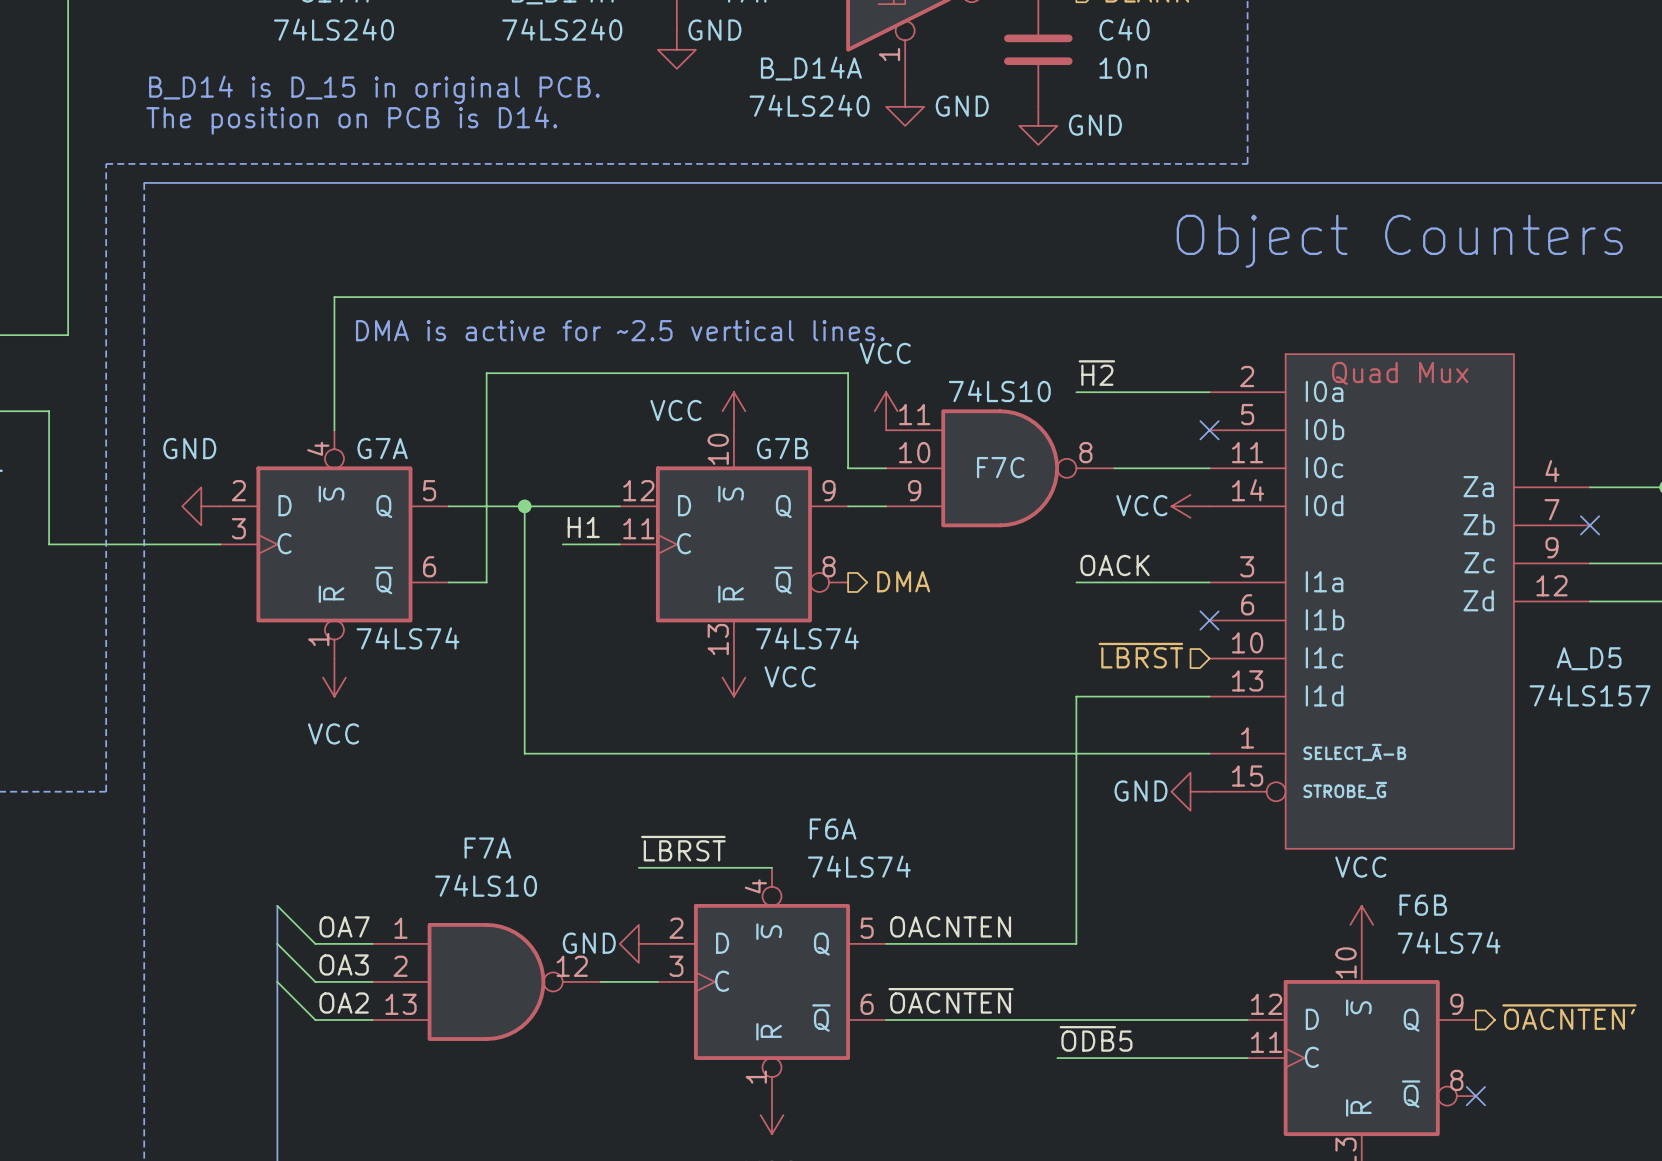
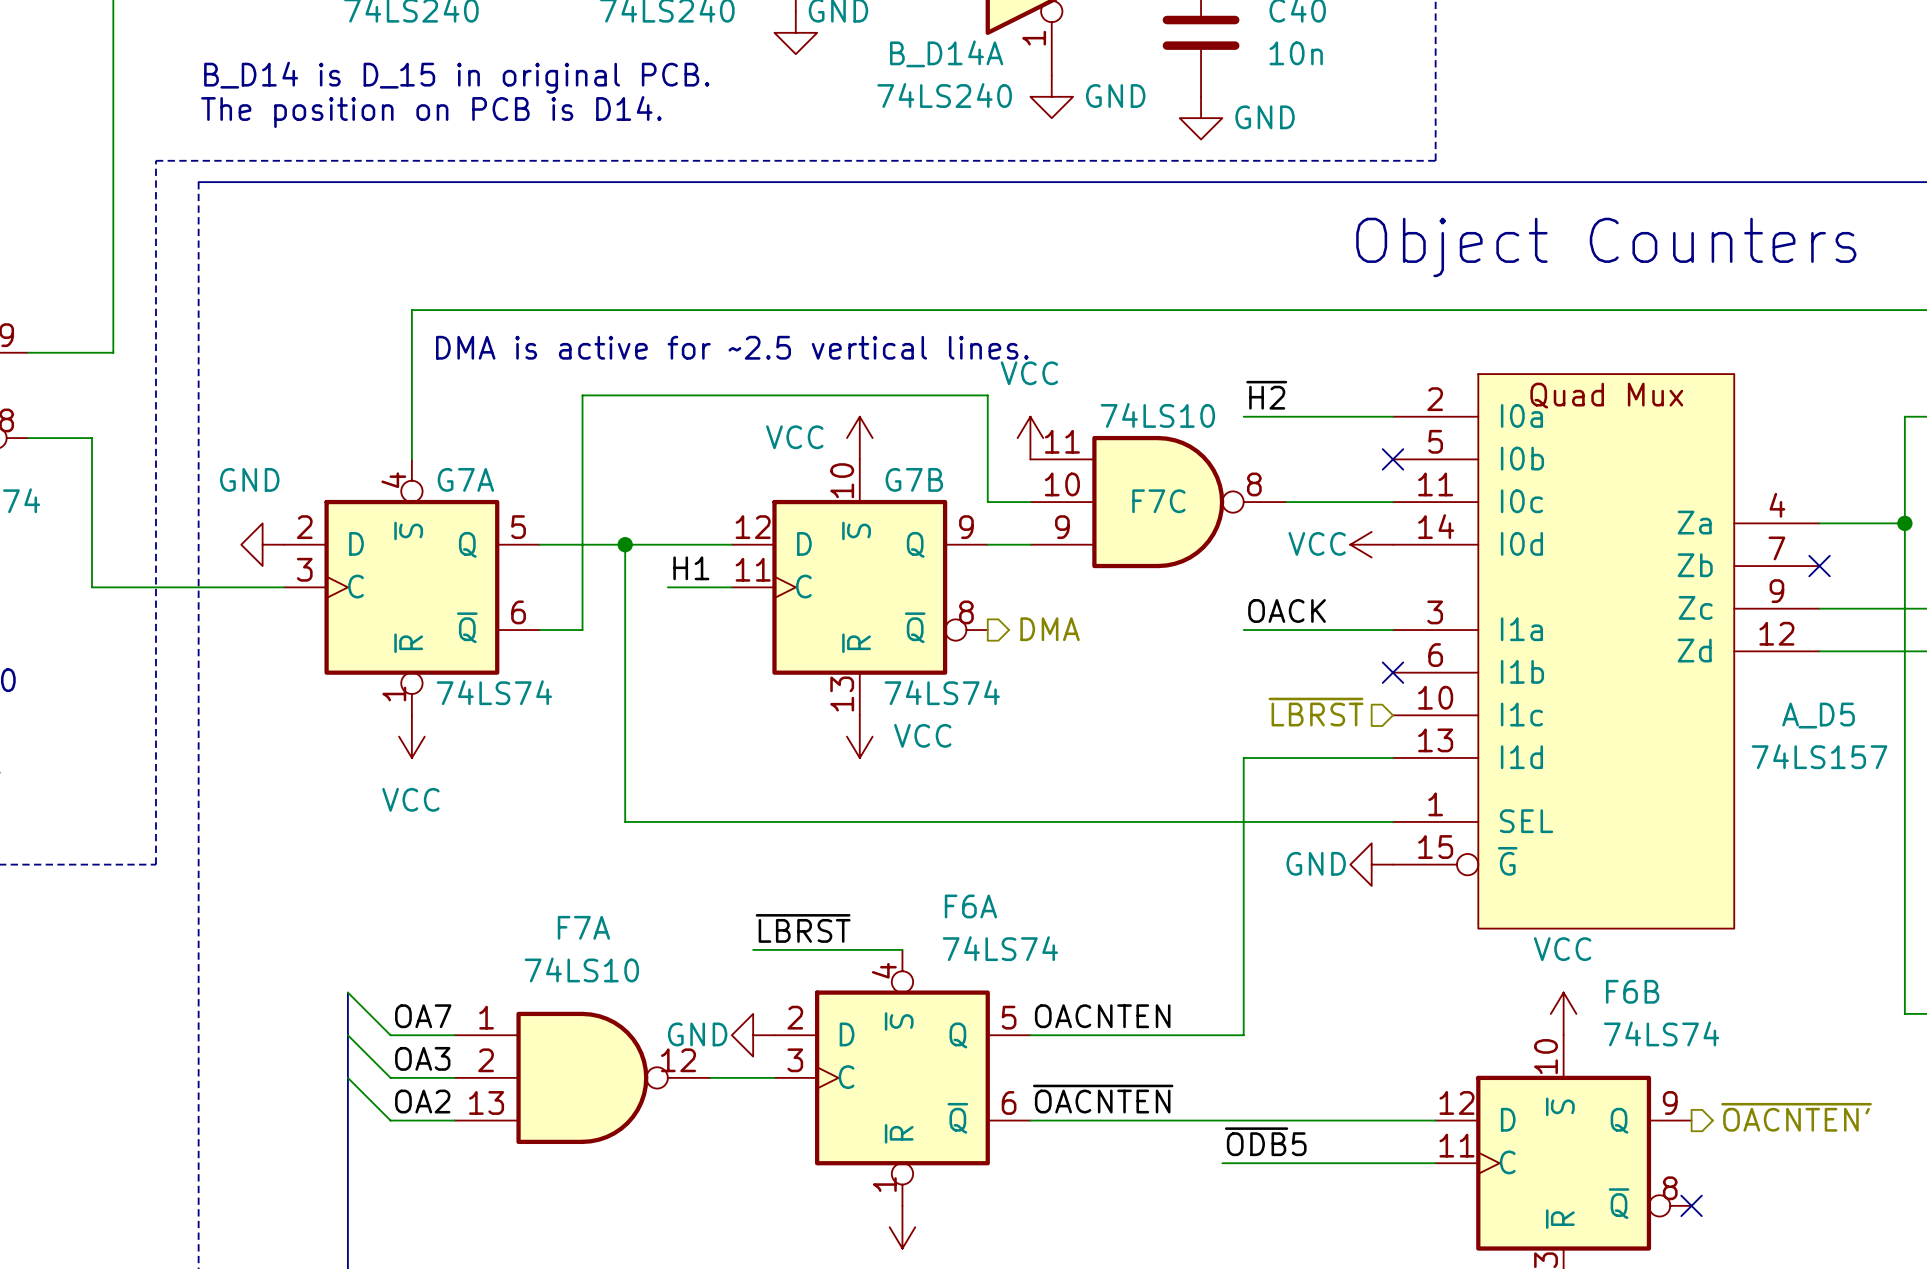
A_D5 pin name: SELECT_~{A}-B (1354, 752) -> SEL (1526, 821)
A_D5 pin name: STROBE_~{G} (1345, 790) -> ~{G} (1507, 861)

